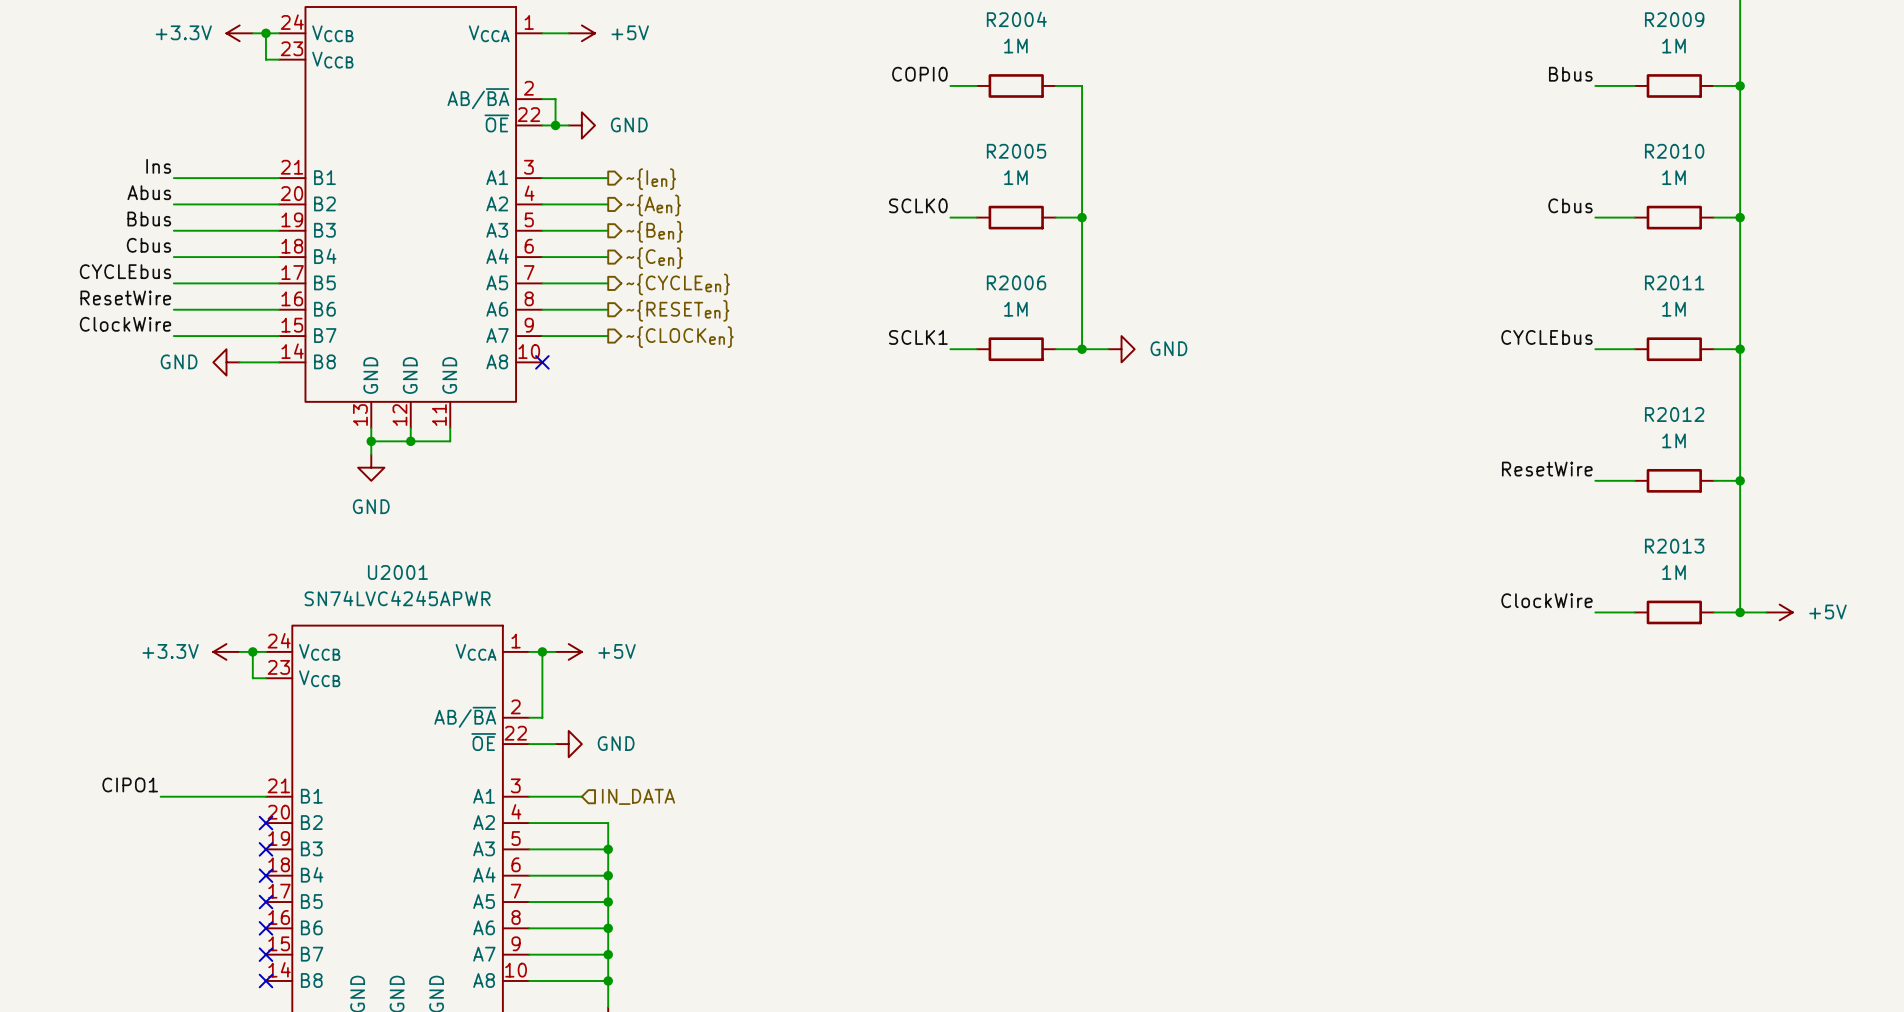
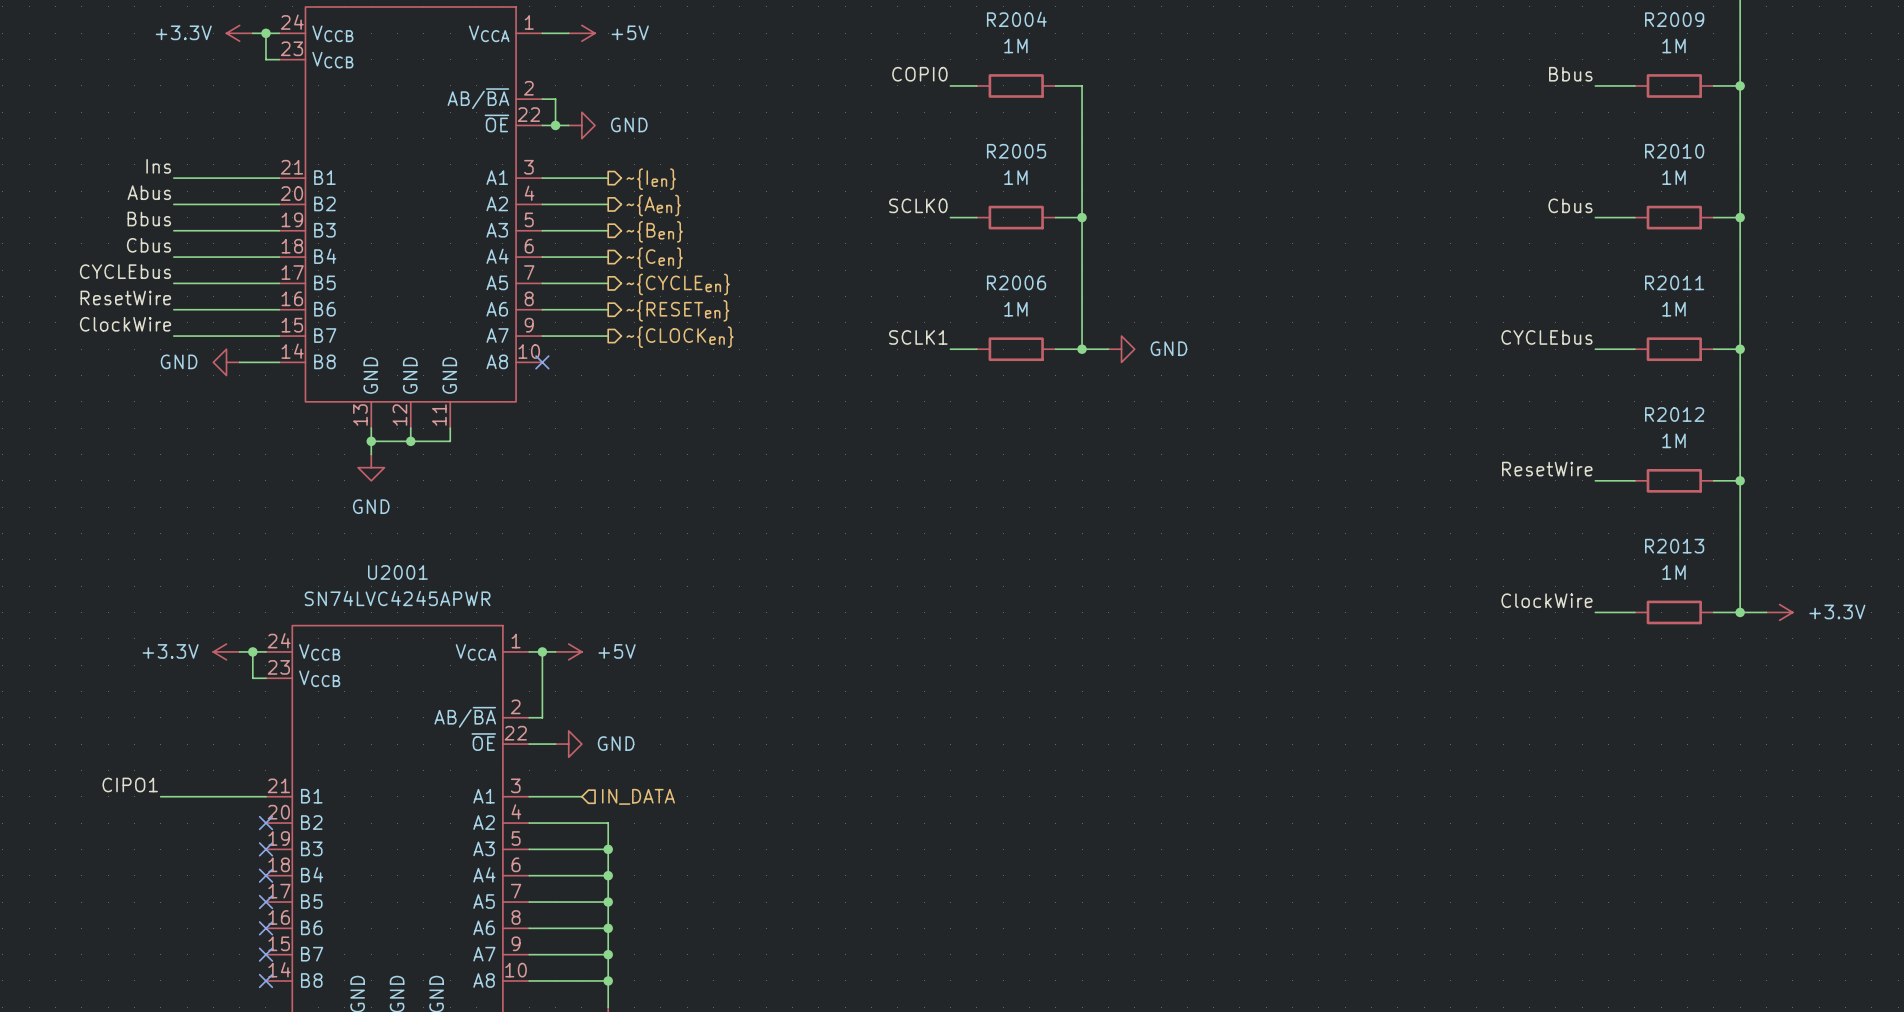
power symbol: +5V (1779, 612) -> +3.3V (1779, 612)

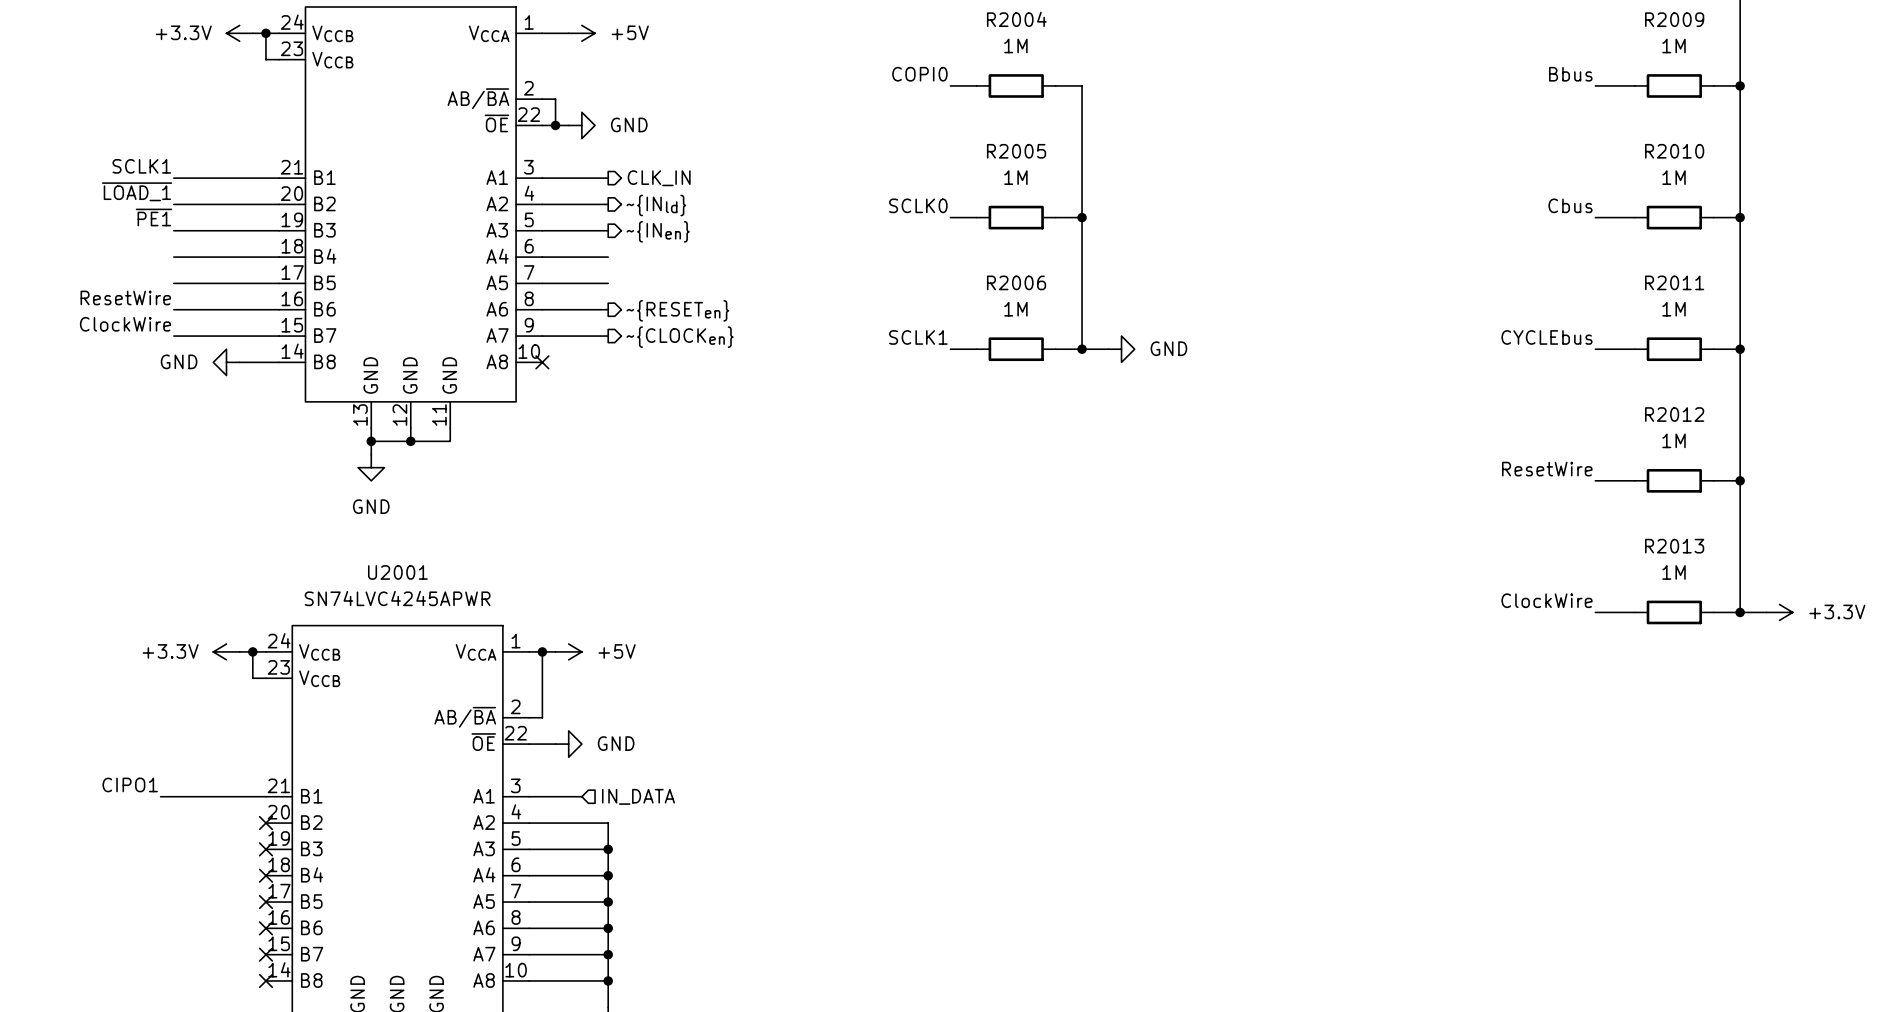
label: Ins (158, 166) -> SCLK1 (141, 166)
hierarchical label: ~{Ien} (651, 179) -> CLK_IN (659, 178)
label: Abus (149, 192) -> ~{LOAD_1} (137, 191)
hierarchical label: ~{Aen} (653, 205) -> ~{INld} (656, 205)
label: Bbus (149, 219) -> ~{PE1} (154, 217)
hierarchical label: ~{Ben} (654, 231) -> ~{INen} (658, 231)
label: Cbus (148, 245) -> none
hierarchical label: ~{Cen} (654, 258) -> none
label: CYCLEbus (125, 271) -> none
hierarchical label: ~{CYCLEen} (678, 284) -> none

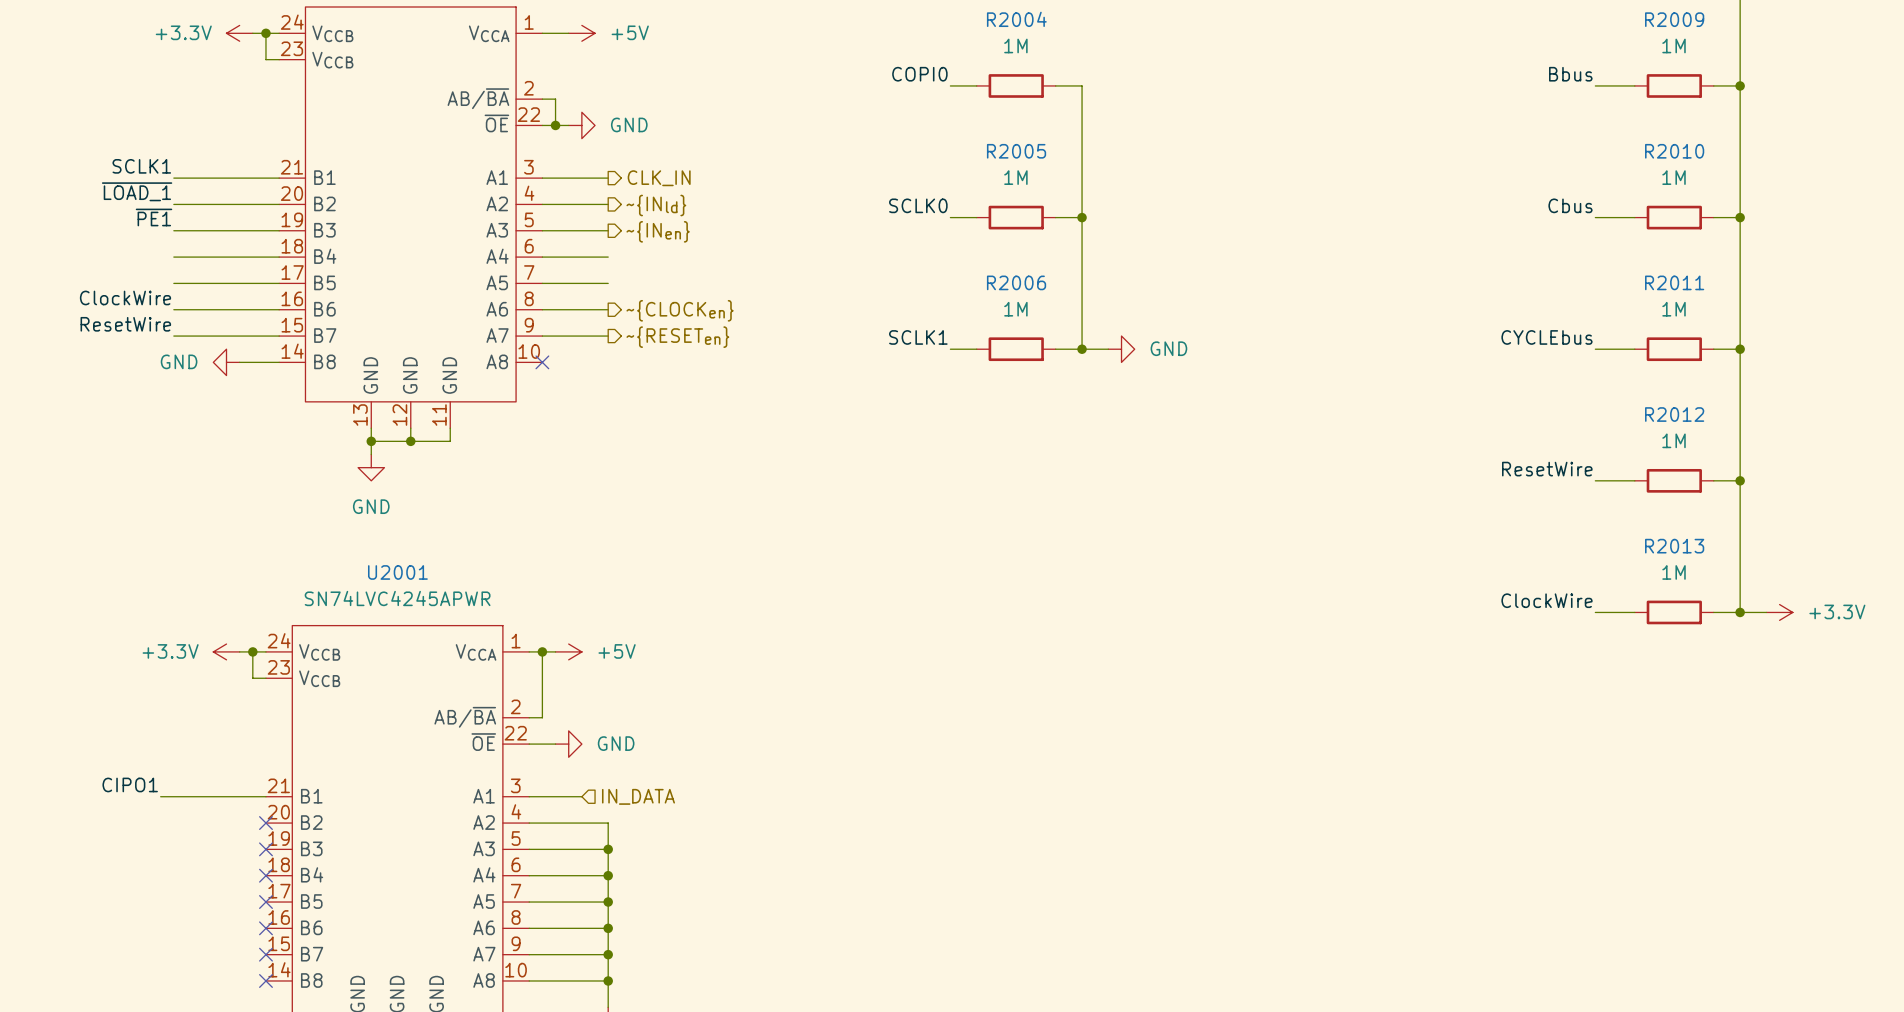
label: ResetWire (125, 297) -> ClockWire (125, 297)
hierarchical label: ~{RESETen} (677, 310) -> ~{CLOCKen} (680, 310)
label: ClockWire (125, 324) -> ResetWire (125, 324)
hierarchical label: ~{CLOCKen} (680, 337) -> ~{RESETen} (677, 337)

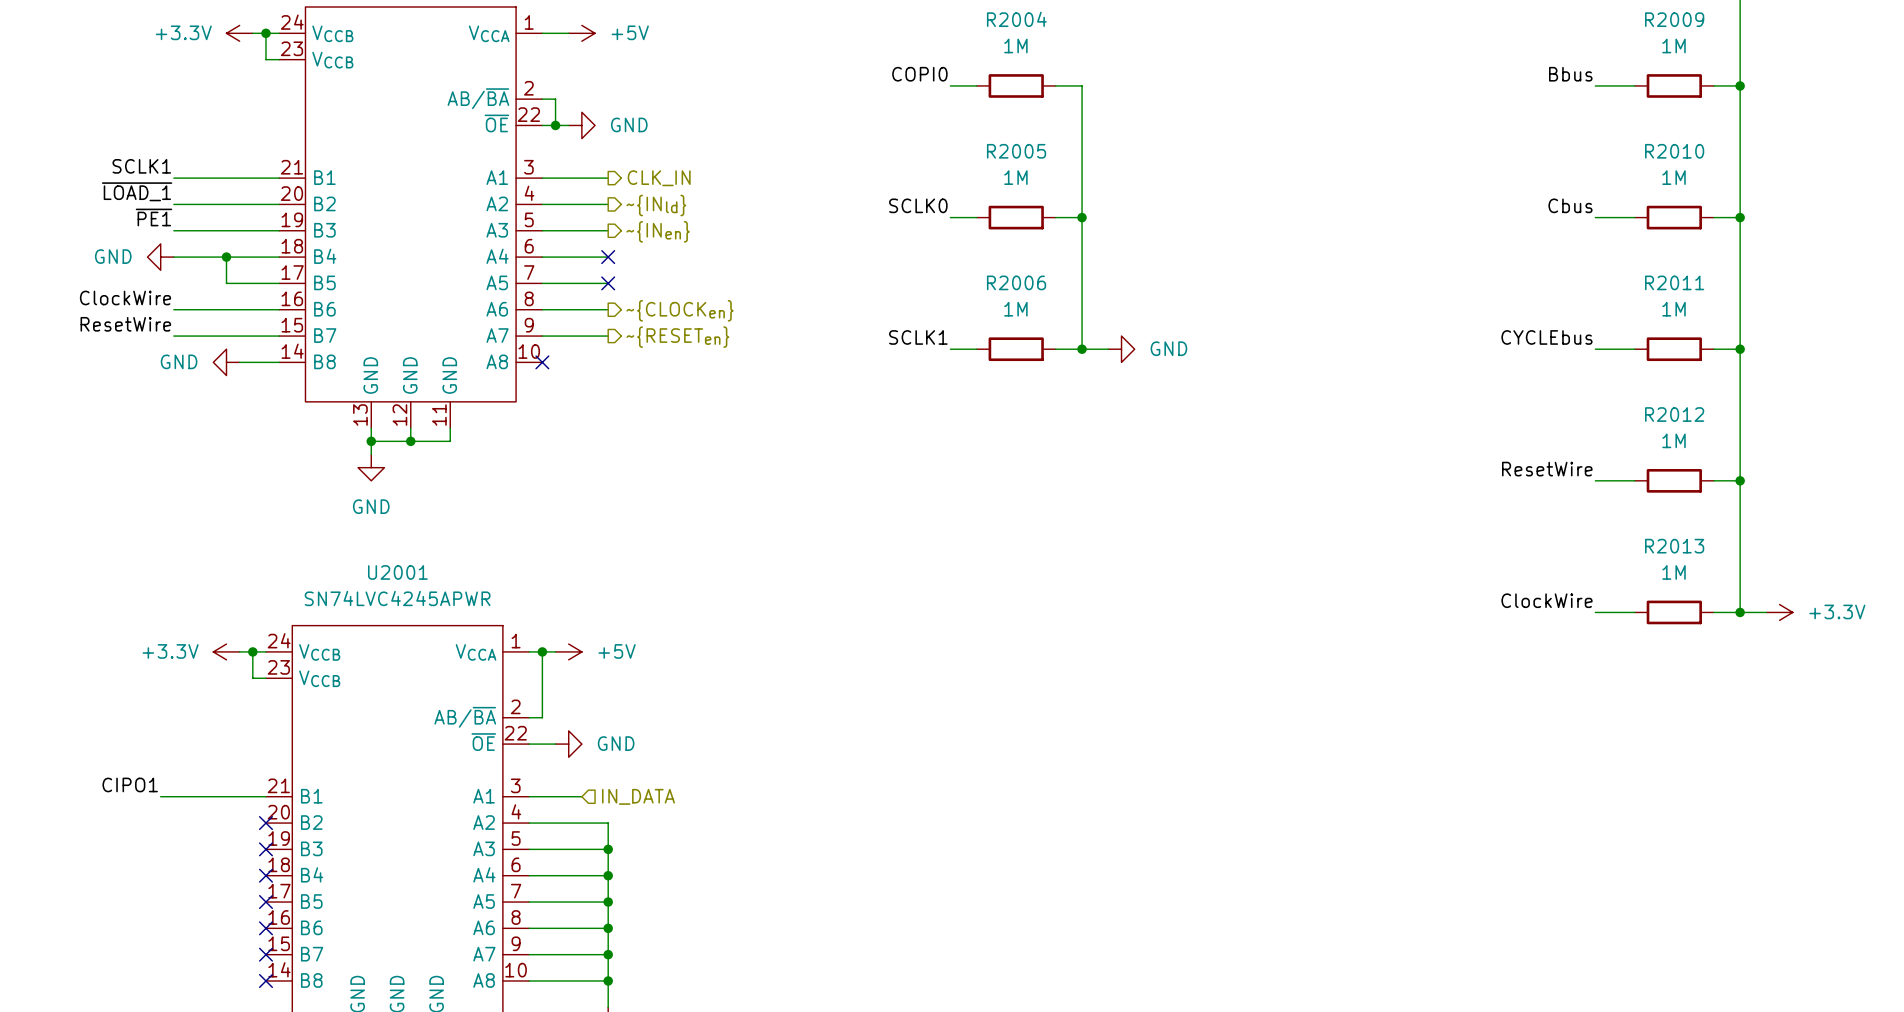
power symbol: none -> GND (160, 257)
junction: none -> (226, 257)
no-connect mark: none -> (608, 257)
wire: (173, 283) (226, 283) -> (226, 257) (226, 283)
no-connect mark: none -> (608, 283)

